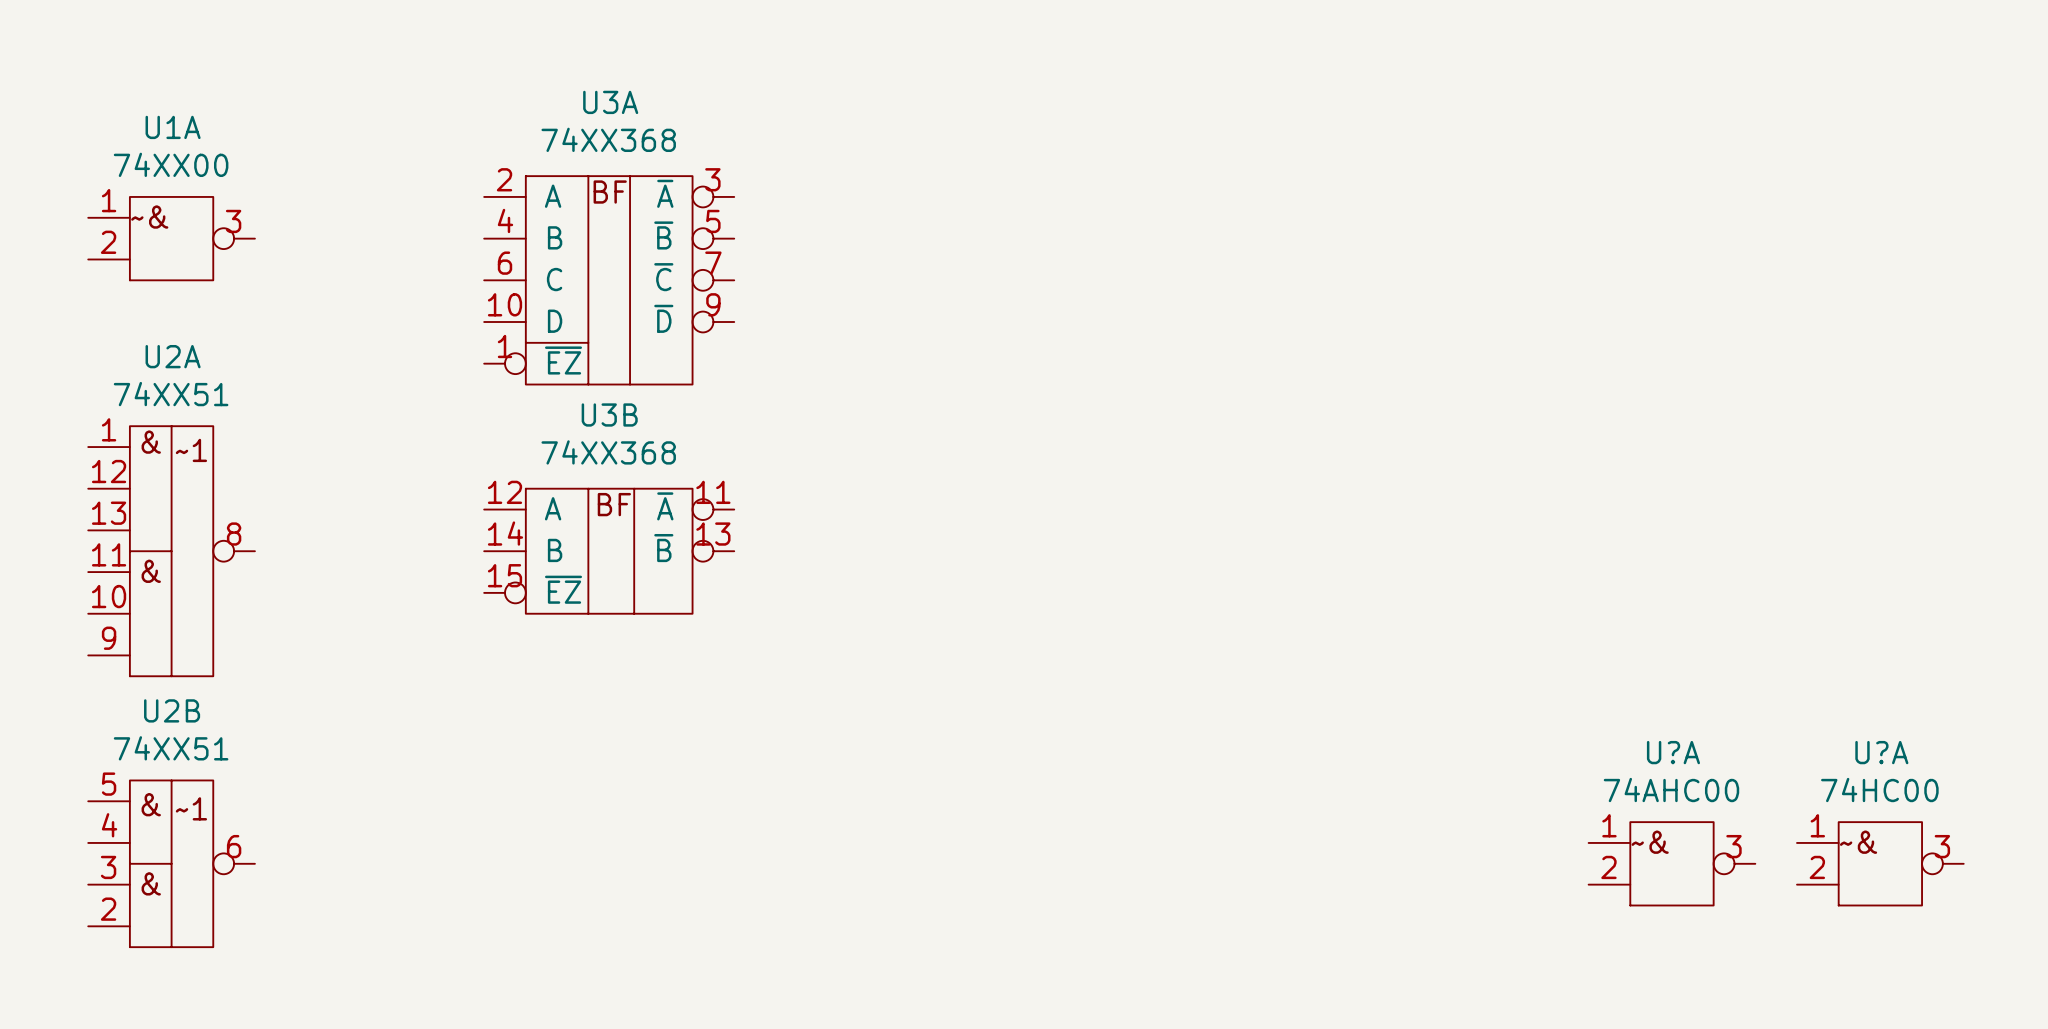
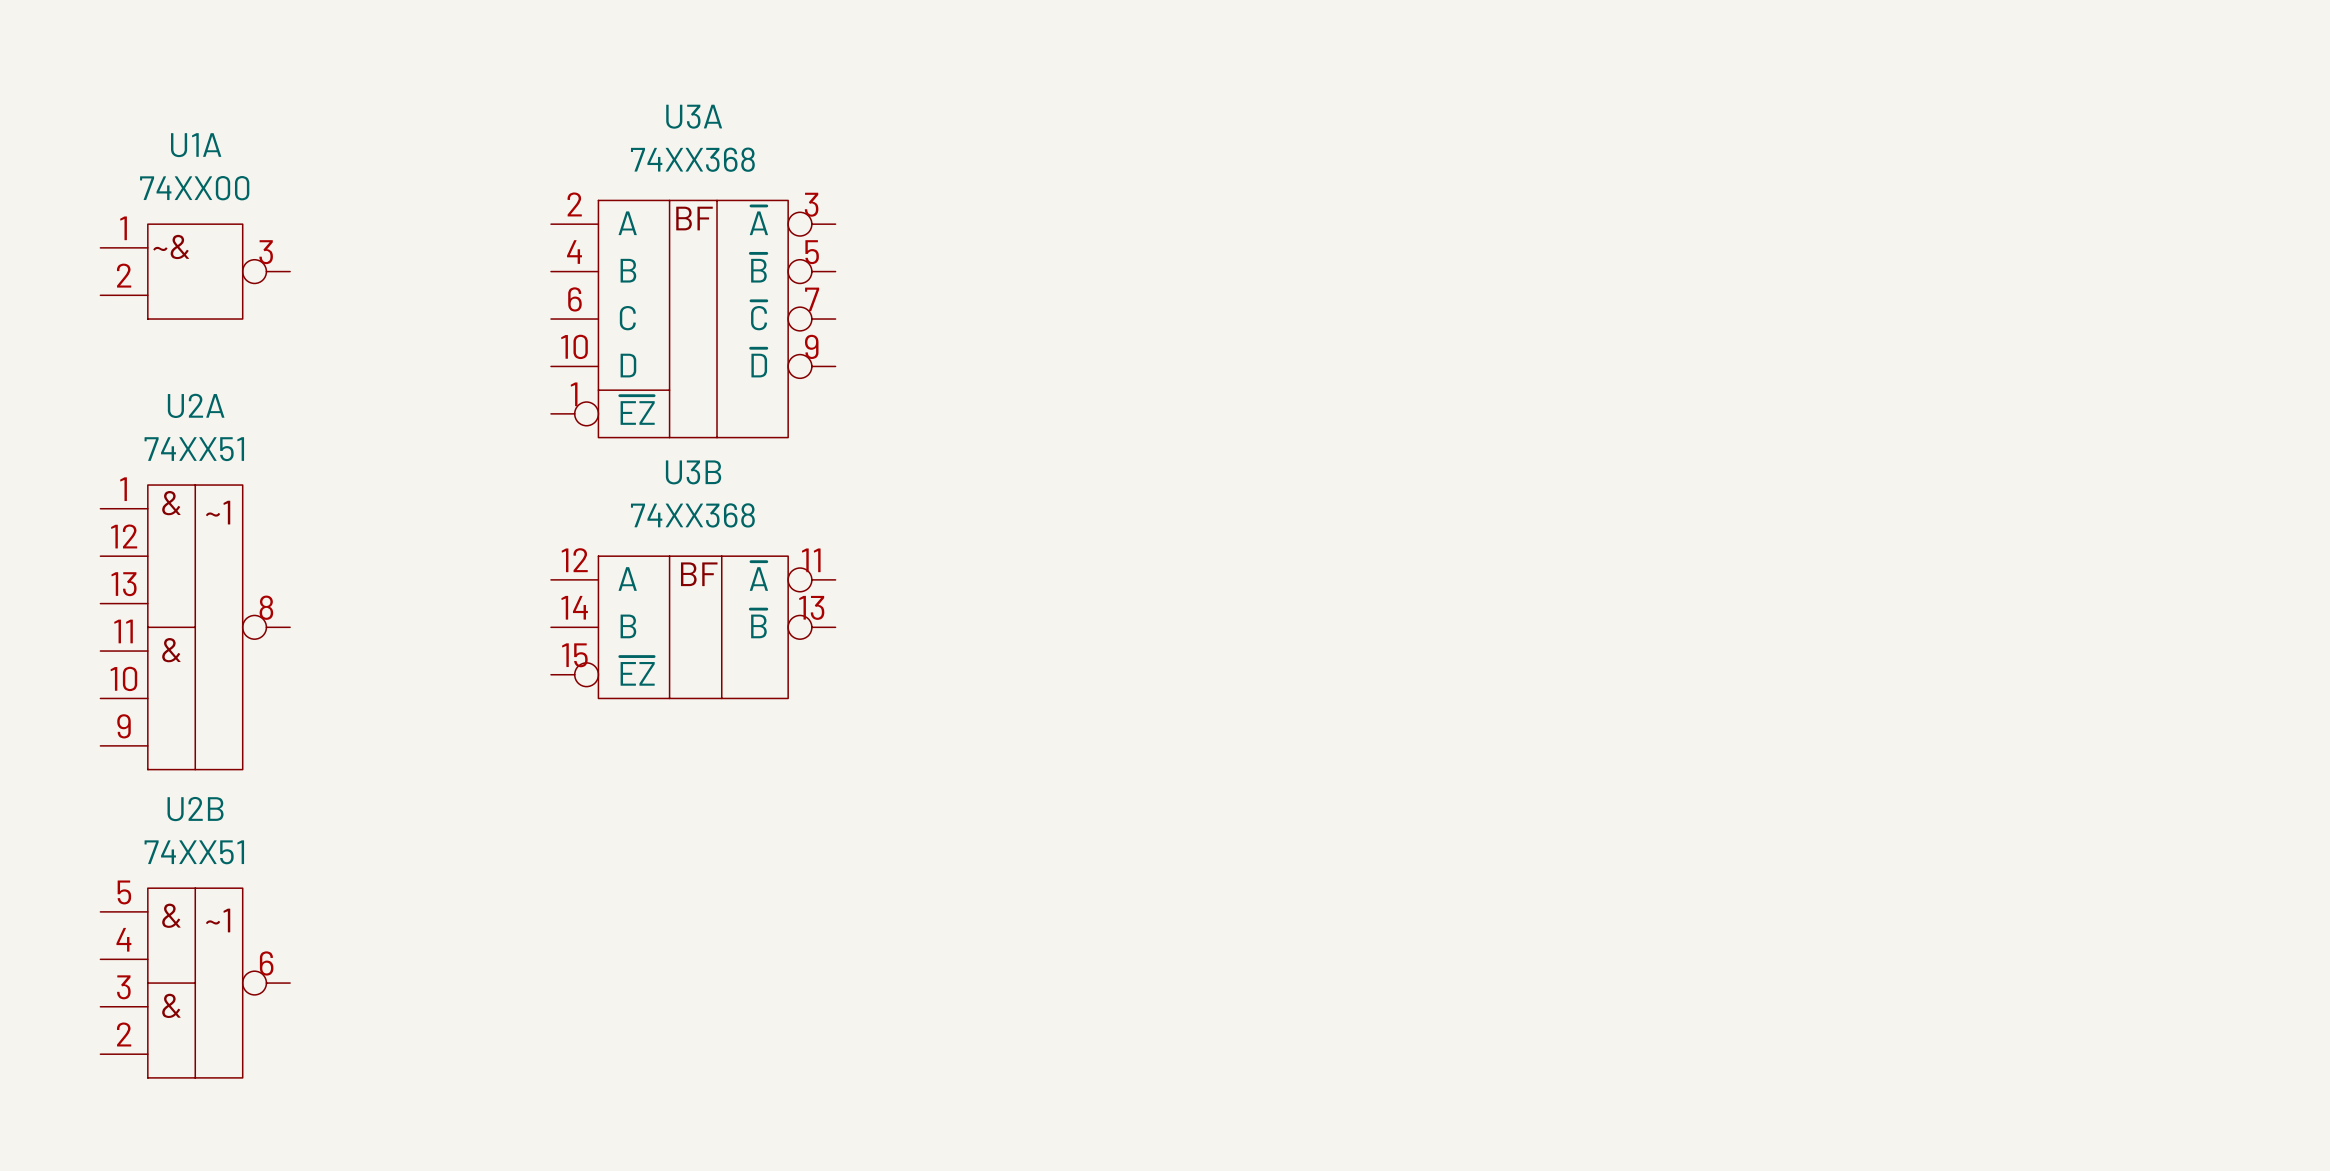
U?A: 74AHC00 (1671, 863) -> none
U?A: 74HC00 (1880, 863) -> none

